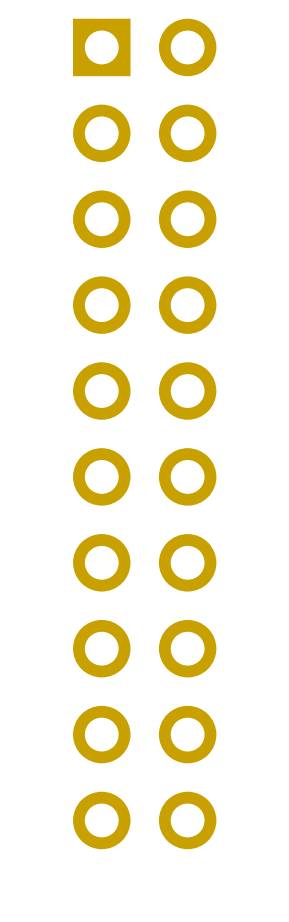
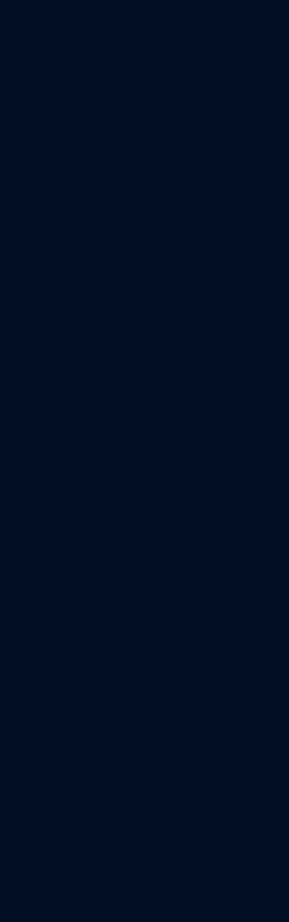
part: (144, 433) -> none

